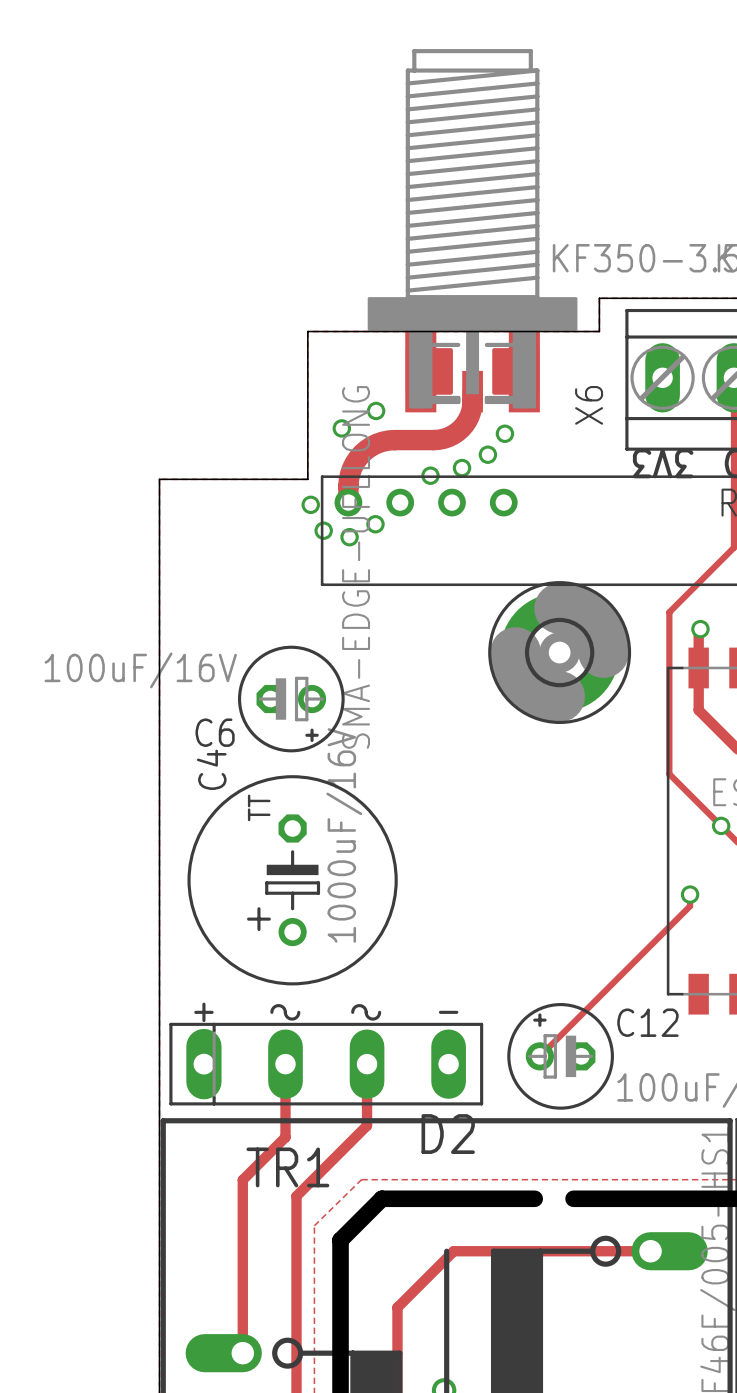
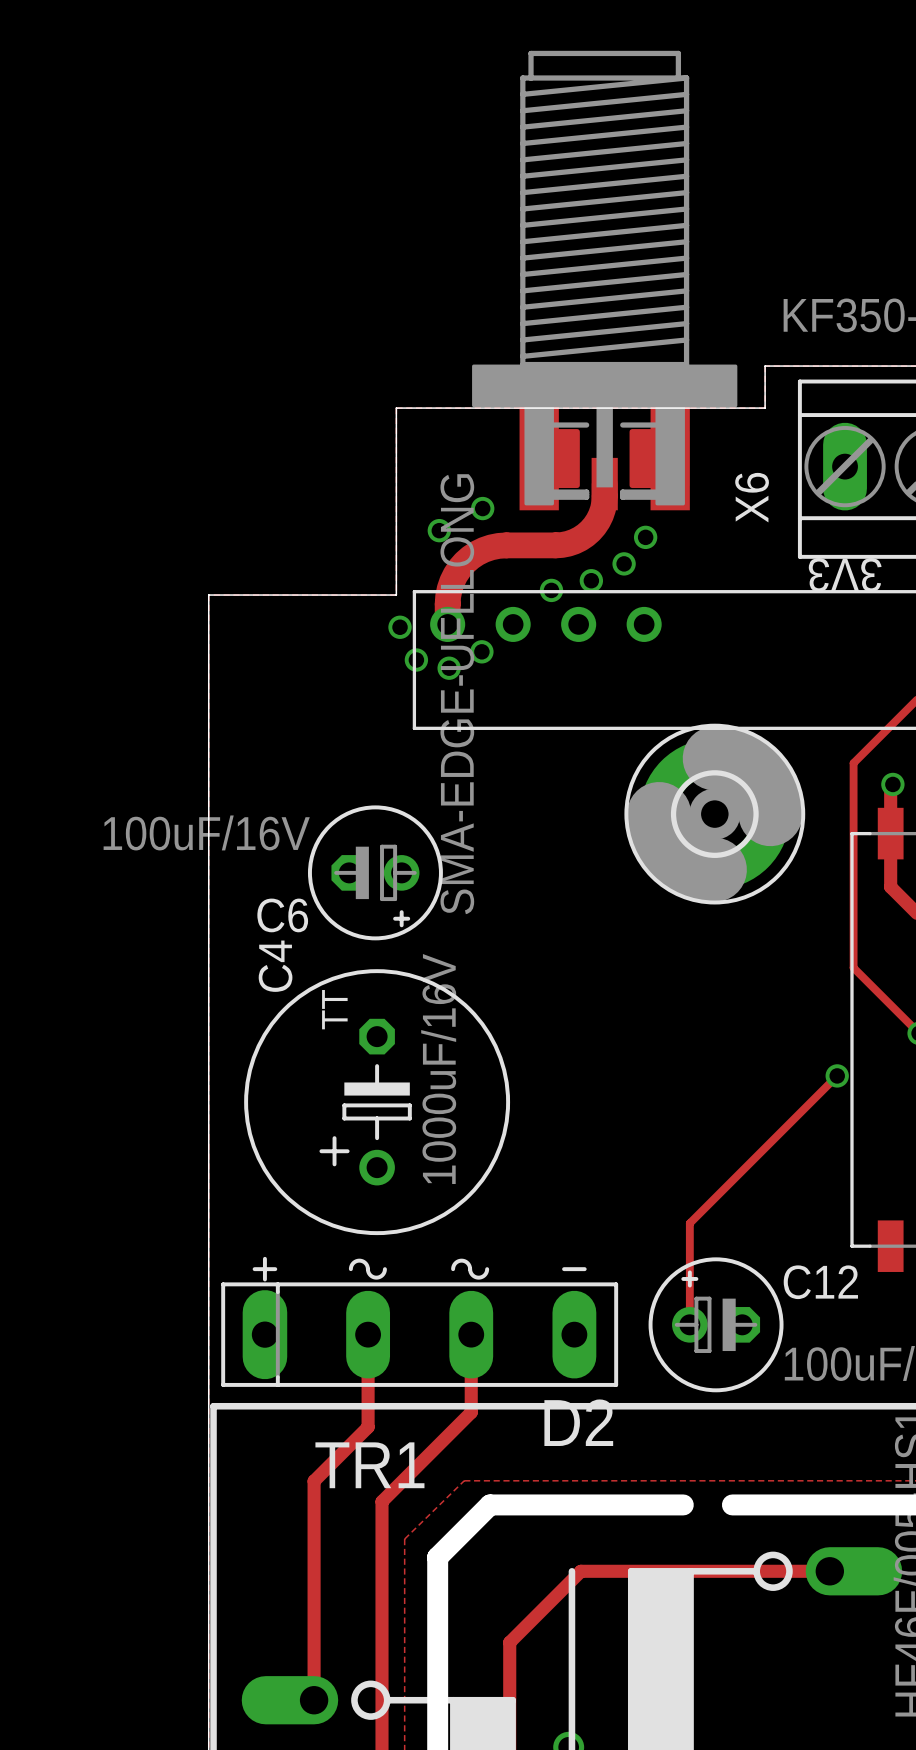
track: (690, 894) (690, 906) (539, 1056) -> (837, 1075) (689, 1223) (689, 1324)
via position: (690, 894) -> (837, 1075)

